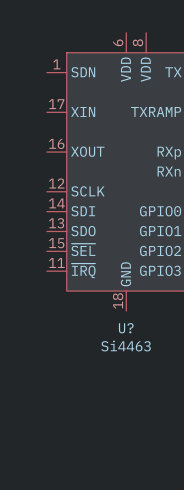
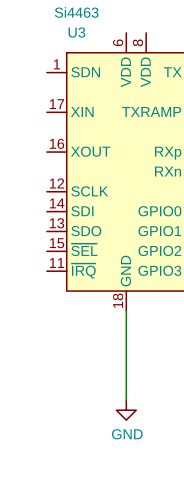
wire: none -> (126, 310) (126, 400)
U? name: U? (126, 328) -> U3 (76, 32)
U? value position: Si4463 (126, 346) -> Si4463 (76, 12)
power symbol: none -> GND (126, 410)

